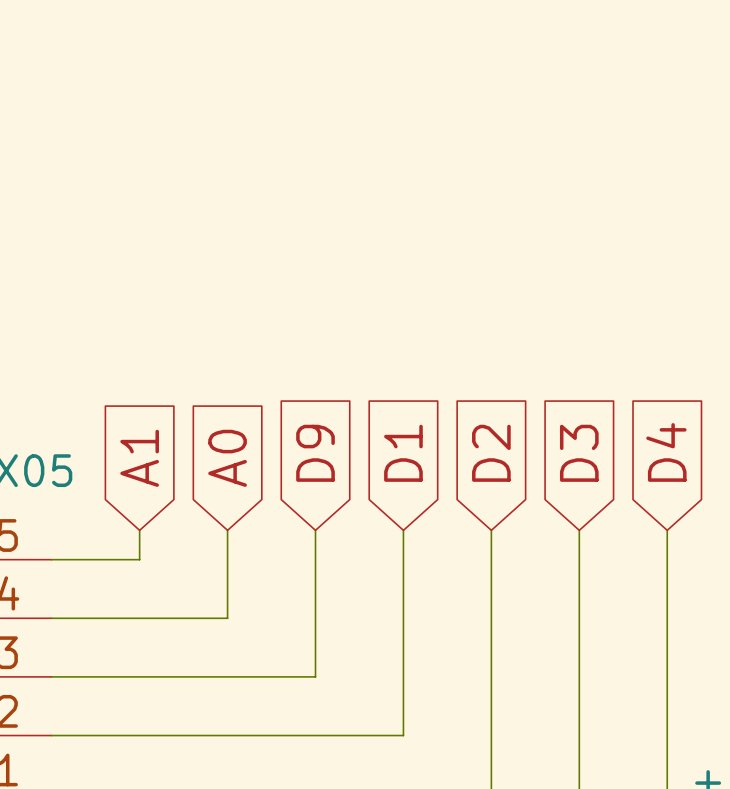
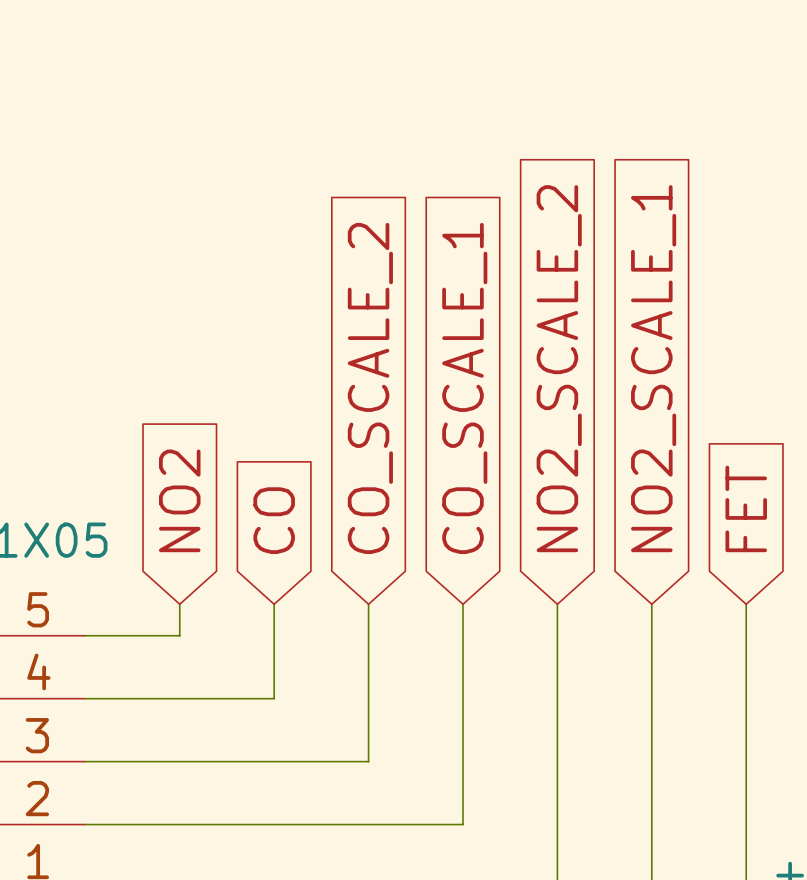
global label: D4 (666, 452) -> FET (746, 508)
global label: D9 (315, 453) -> CO_SCALE_2 (370, 388)
global label: D1 (403, 453) -> CO_SCALE_1 (464, 388)
global label: D2 (491, 453) -> NO2_SCALE_2 (559, 368)
global label: D3 (579, 453) -> NO2_SCALE_1 (653, 368)
global label: A1 (139, 458) -> NO2 (179, 500)
global label: A0 (227, 458) -> CO (274, 520)

